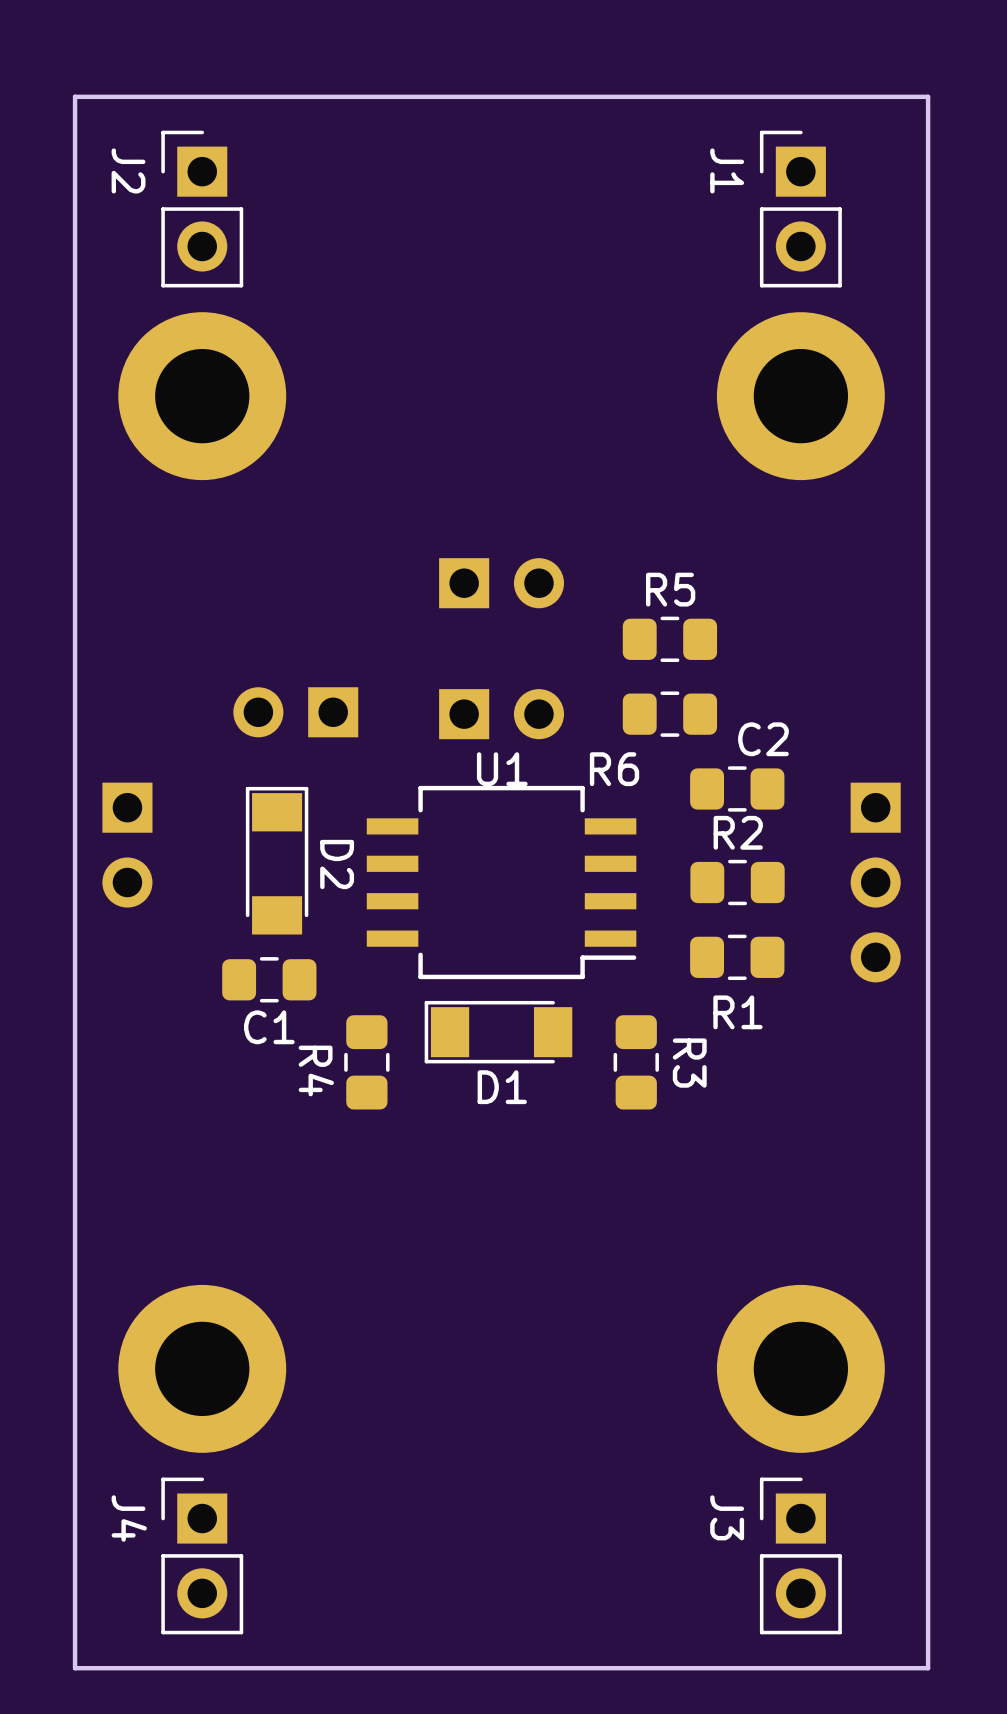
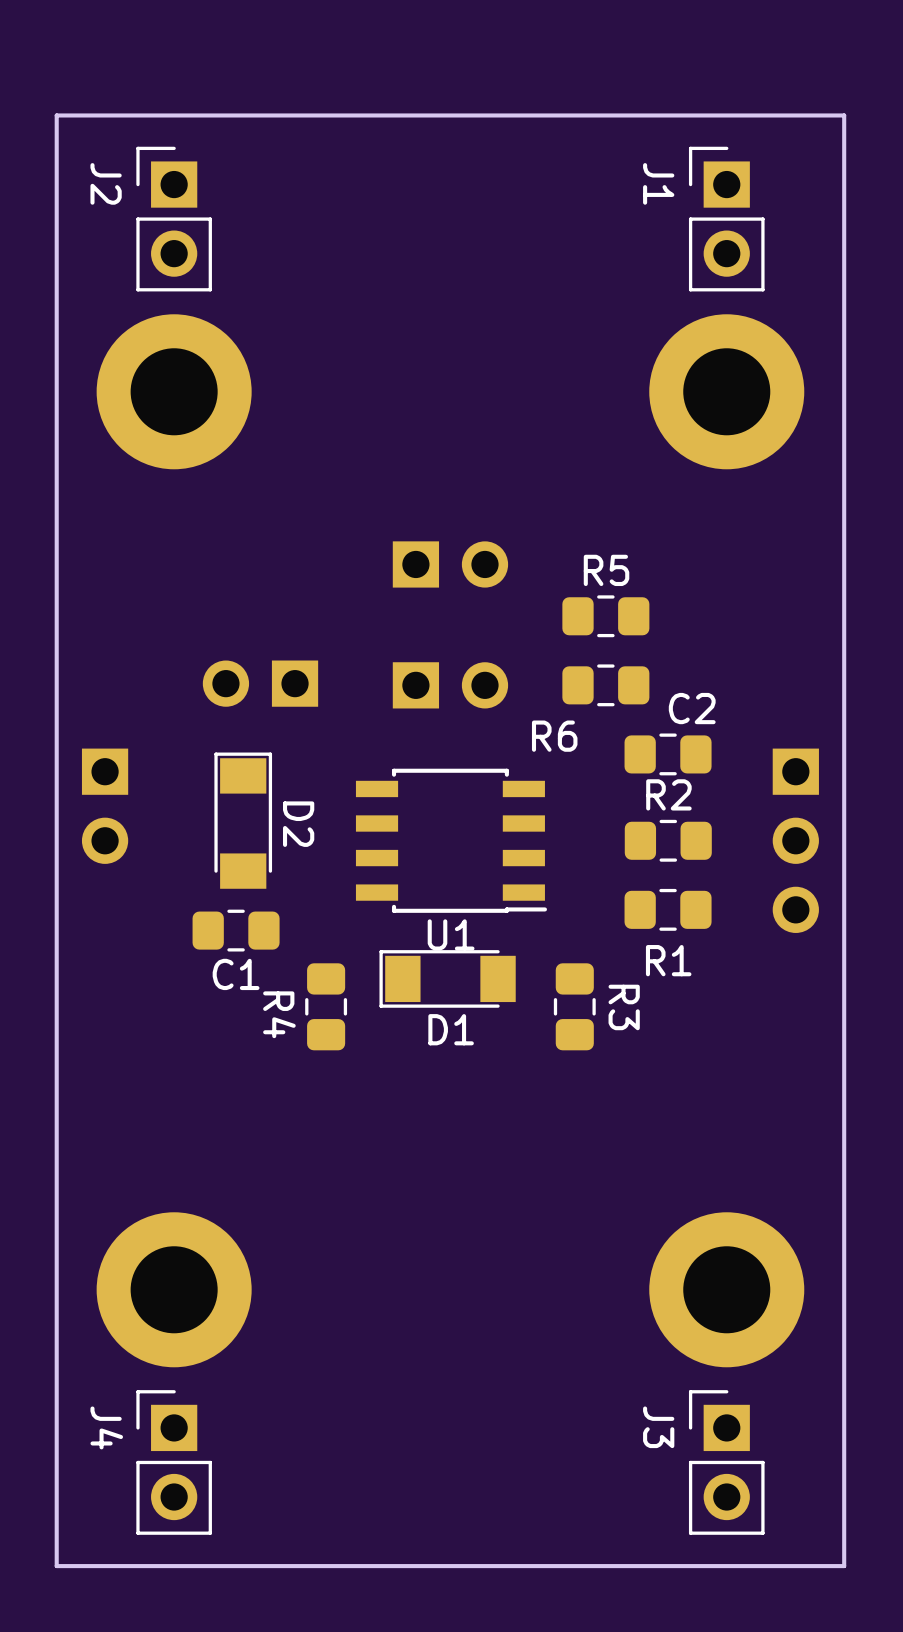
U1 name position: U1 (502, 769) -> U1 (451, 934)
U1 footprint: [366, 785, 637, 980] -> [355, 768, 548, 913]

